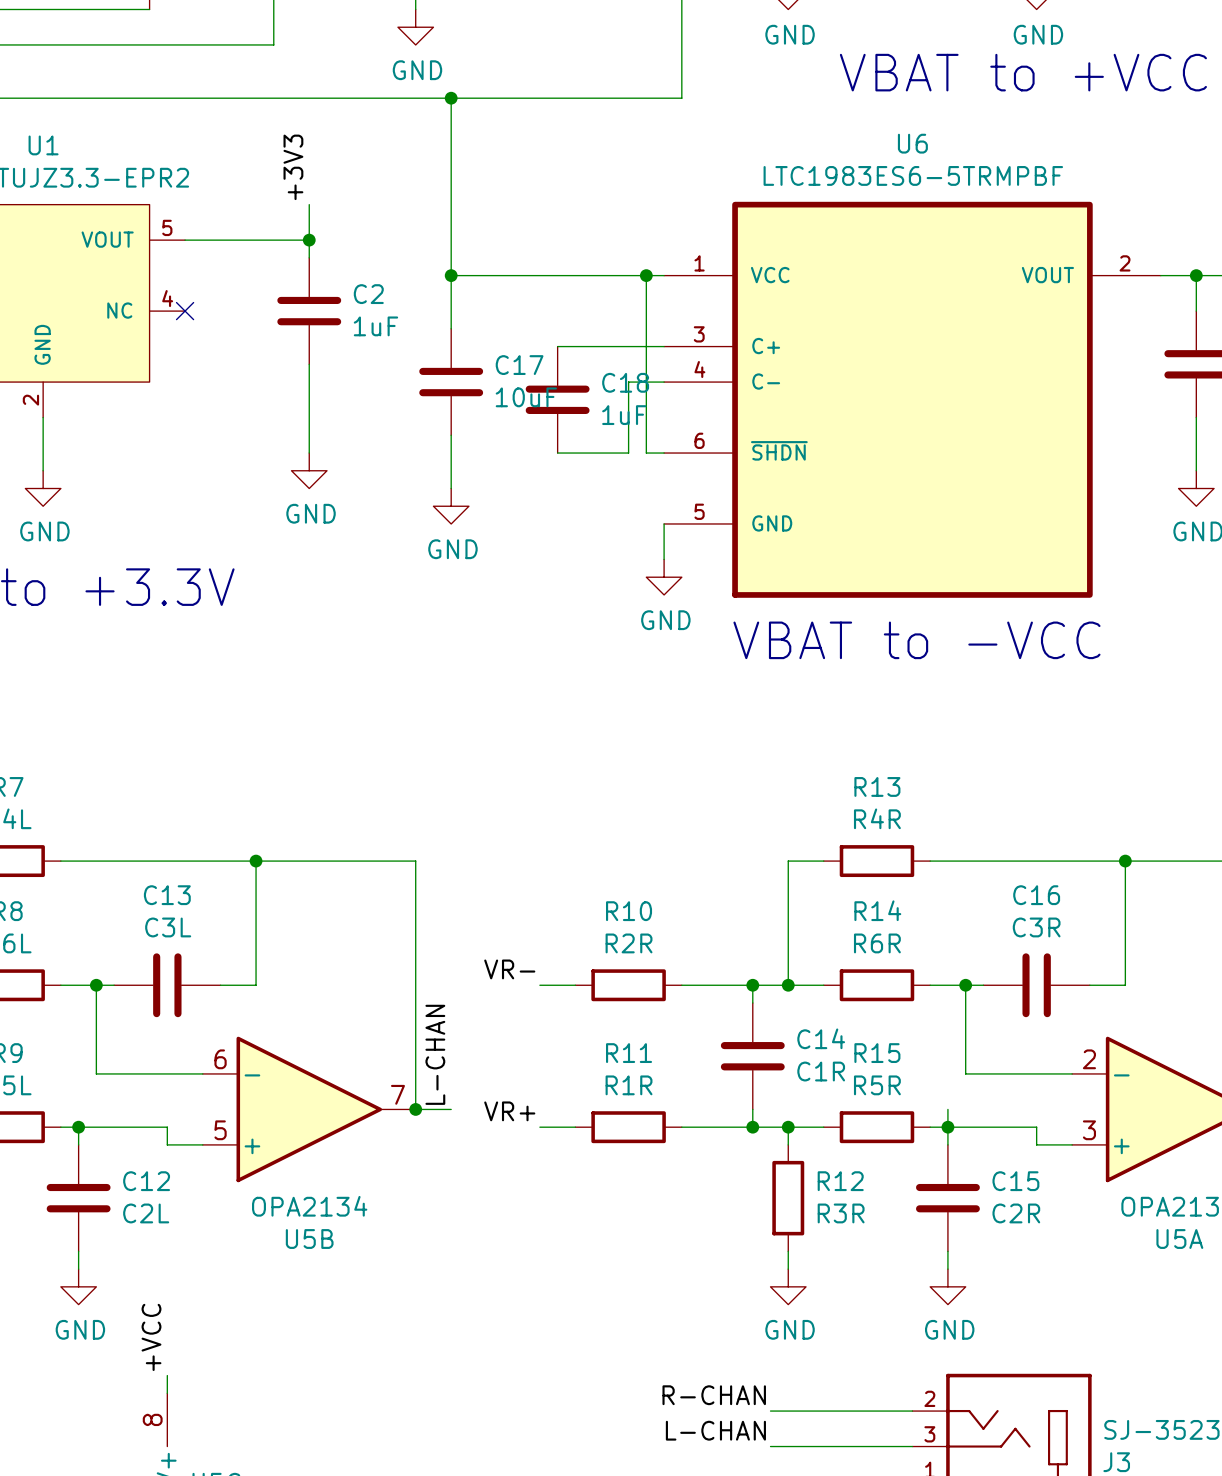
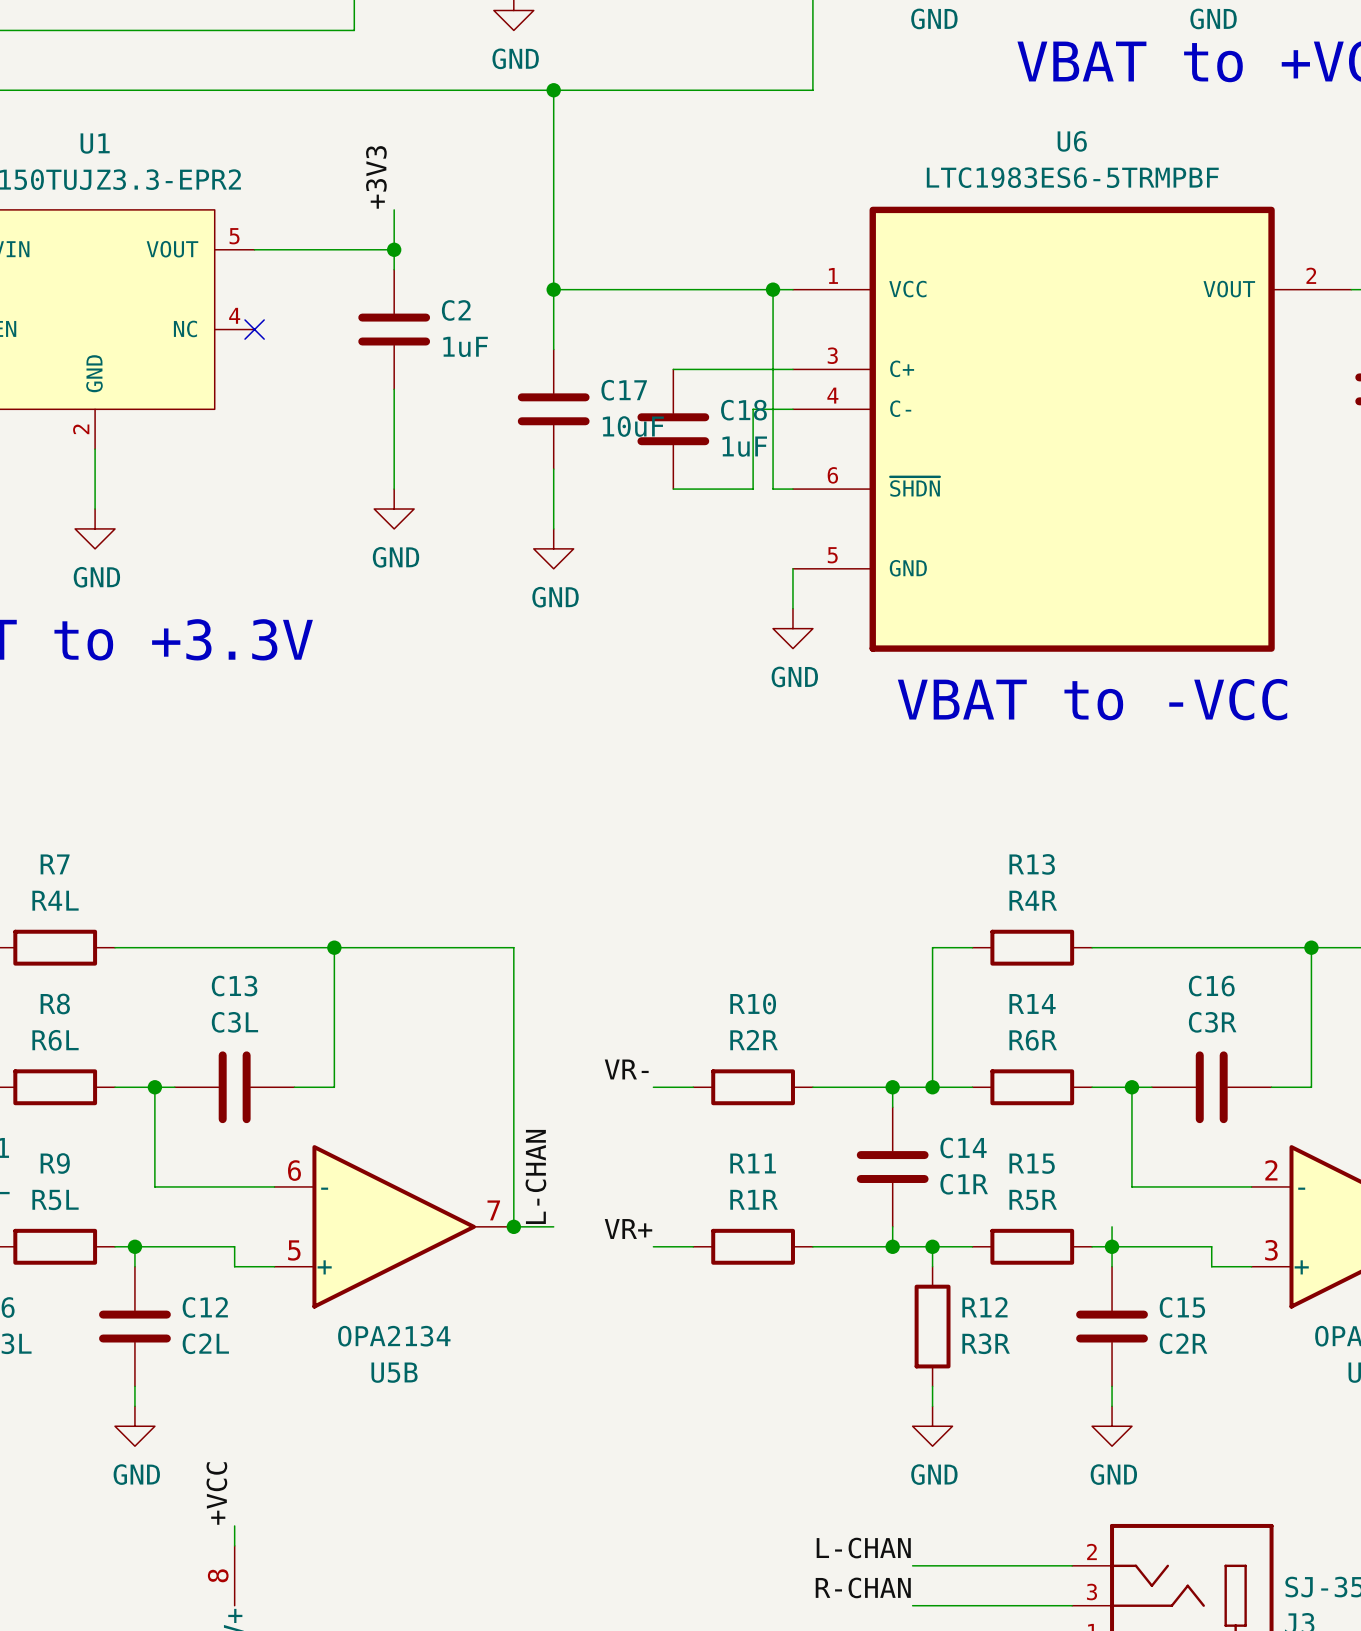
label: R-CHAN (714, 1395) -> L-CHAN (863, 1548)
label: L-CHAN (715, 1430) -> R-CHAN (863, 1587)

